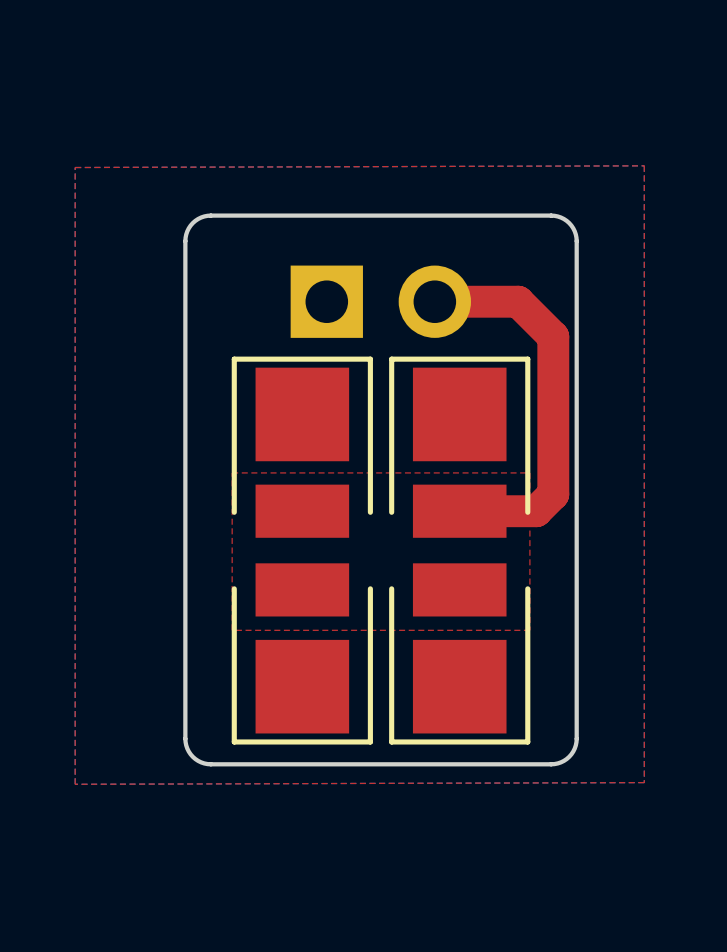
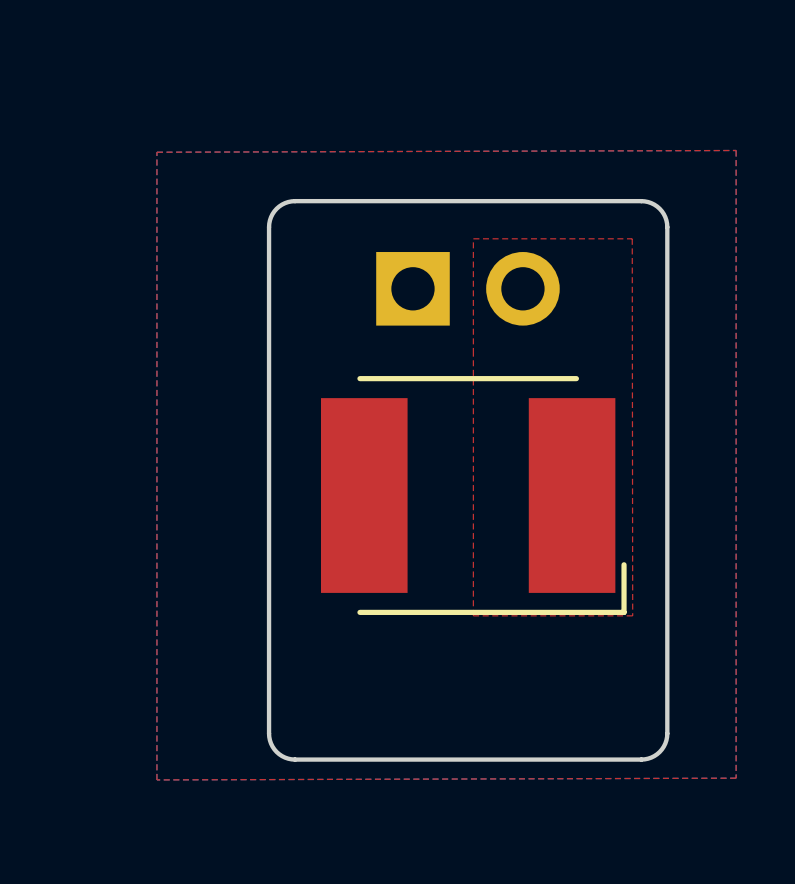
top zone outline: none -> (473, 238) (632, 238) (632, 615) (473, 615) (473, 238)
top track: (434, 301) (518, 301) (553, 336) (553, 494) (536, 511) (459, 511) -> none
part: (302, 447) -> none
part: (459, 447) -> none
top zone outline: (232, 472) (529, 472) (529, 630) (232, 630) (232, 472) -> none
part: none -> (473, 495)
part: (302, 653) -> none
part: (459, 653) -> none

